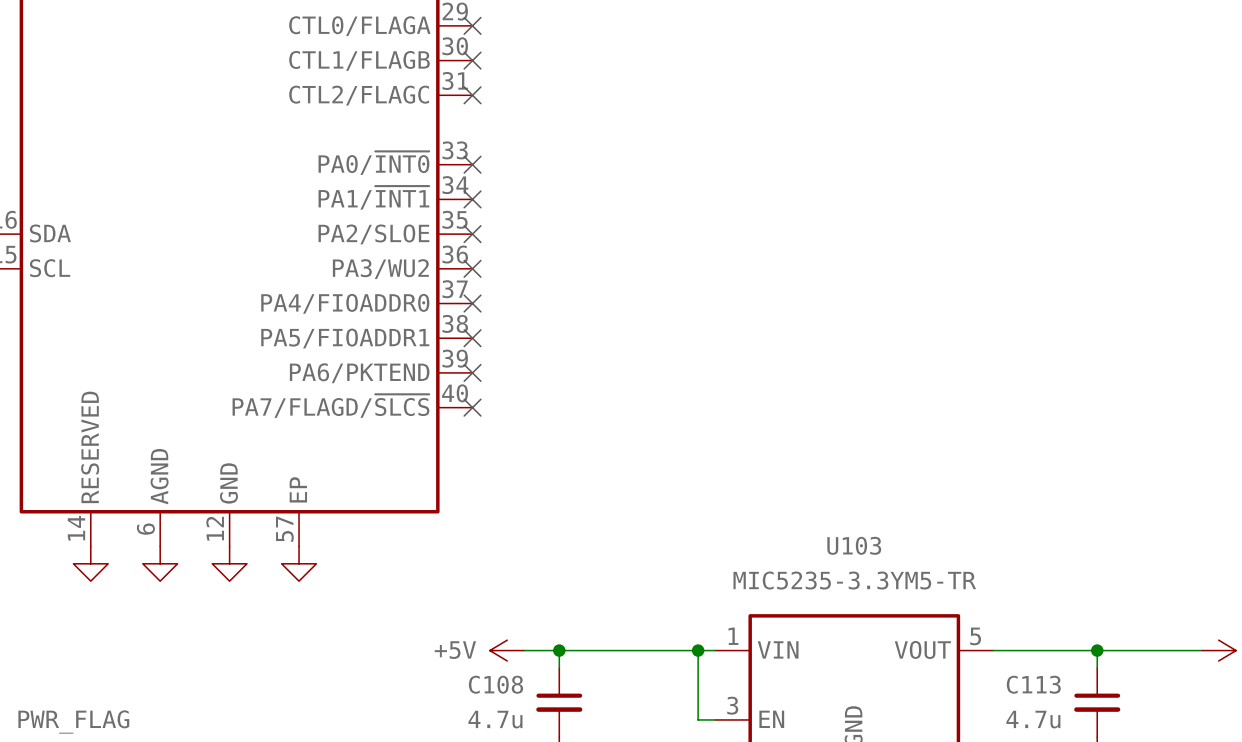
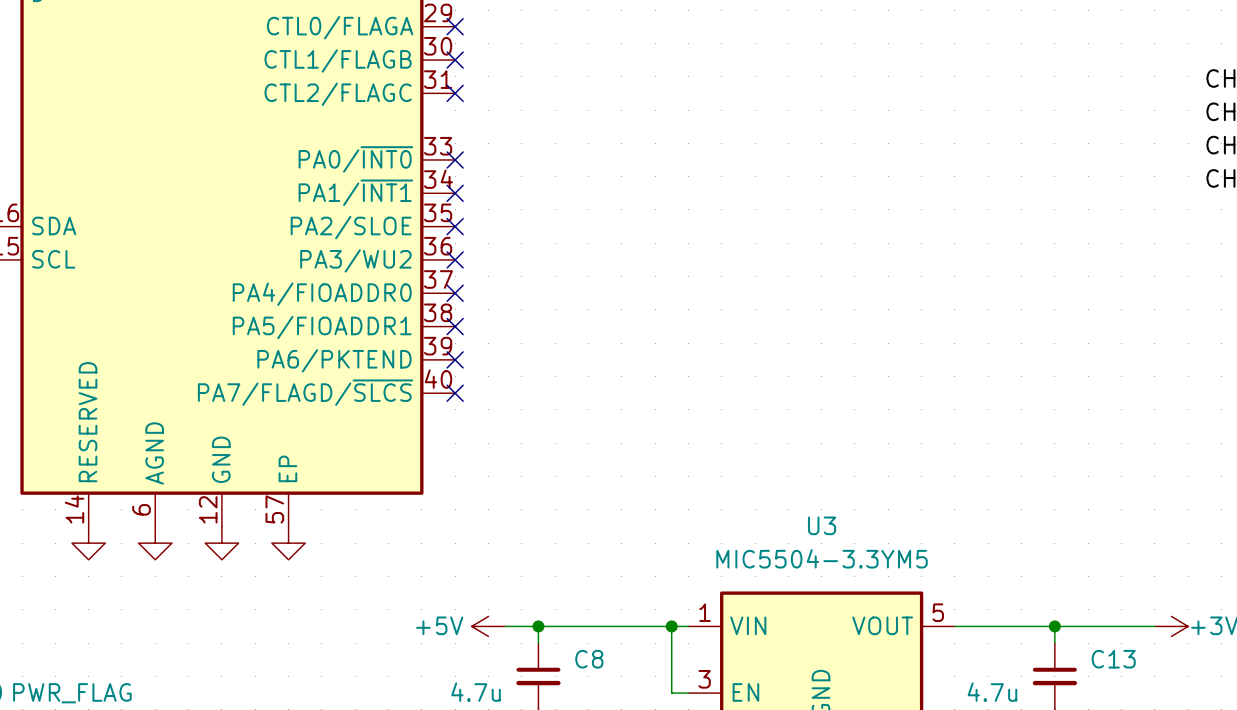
U103 name: U103 (854, 545) -> U3 (822, 525)
U103 value: MIC5235-3.3YM5-TR (854, 580) -> MIC5504-3.3YM5 (822, 558)
C108 name: C108 (495, 684) -> C8 (589, 659)
C113 name: C113 (1033, 684) -> C13 (1113, 659)

